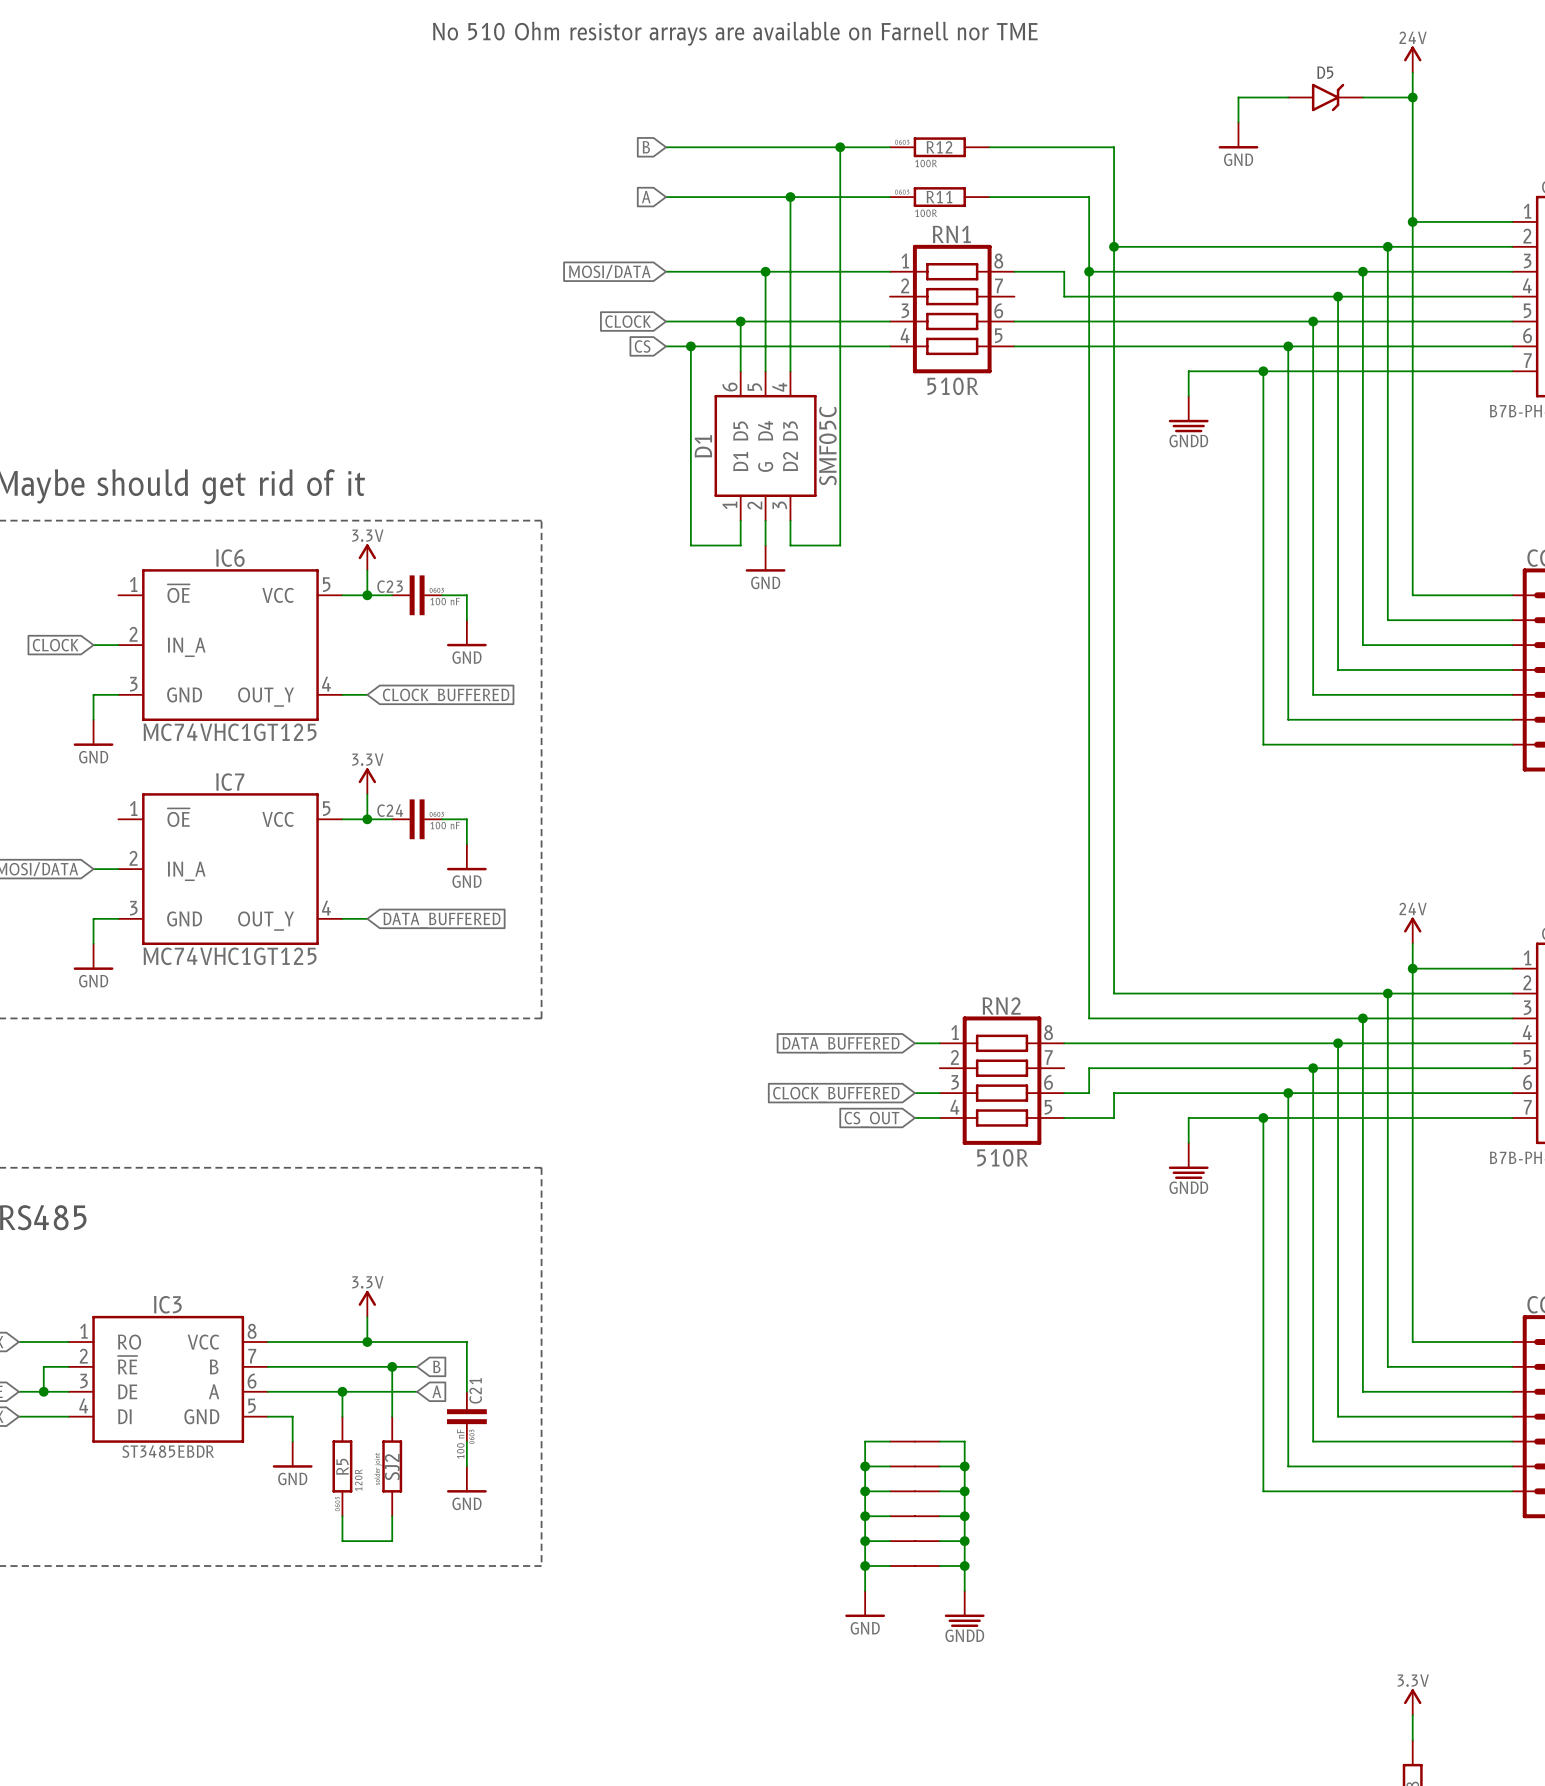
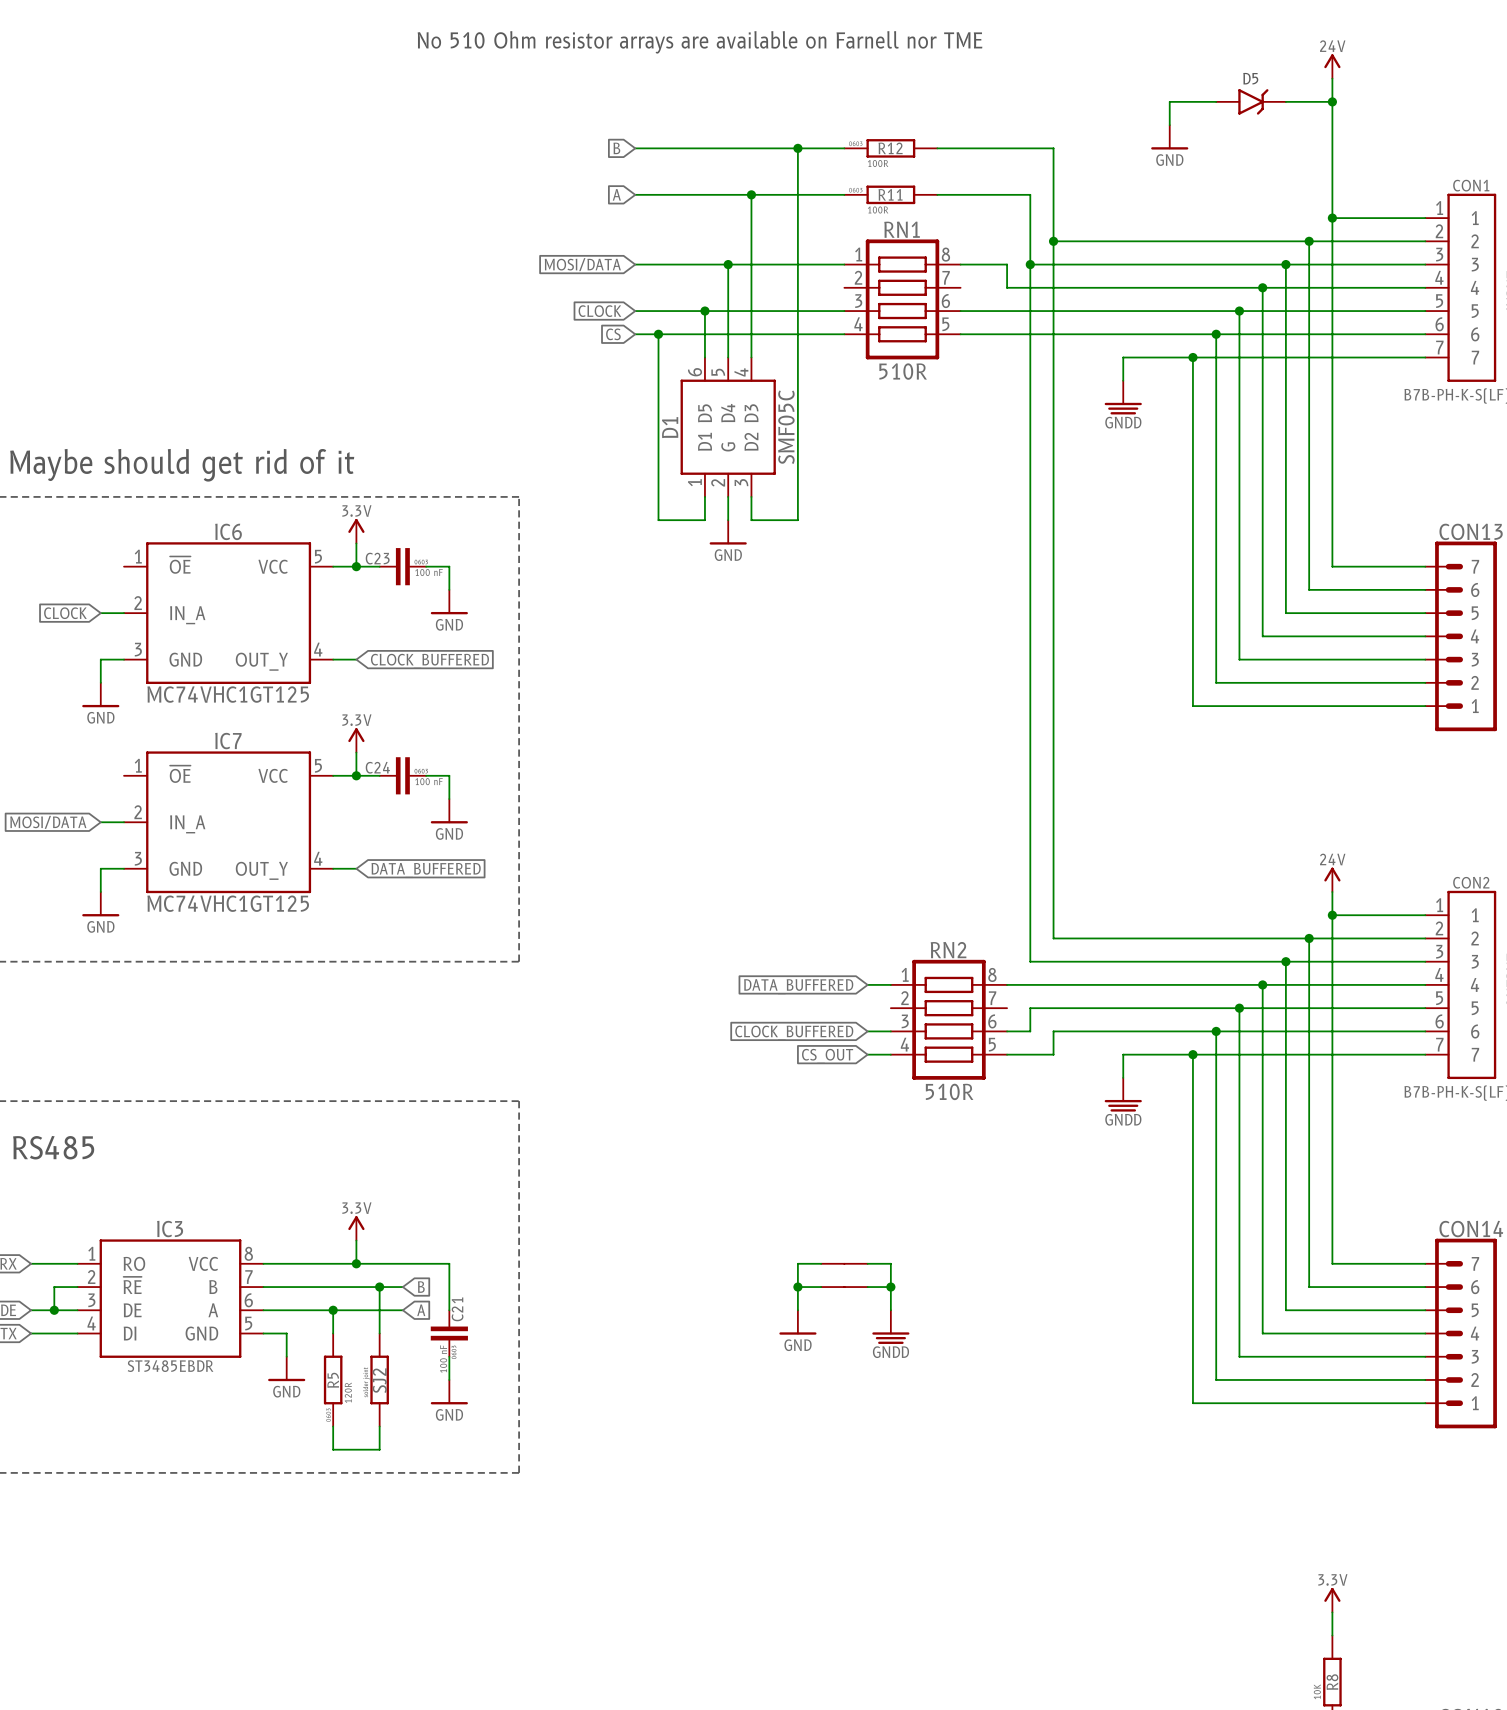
wire: none -> (821, 1263) (797, 1263) (797, 1310)
part: none -> (844, 1263)
wire: none -> (867, 1263) (890, 1263) (890, 1310)
junction: none -> (797, 1287)
part: none -> (844, 1287)
junction: none -> (890, 1287)
wire: (890, 1441) (865, 1441) (865, 1590) -> none
part: (914, 1441) -> none
wire: (939, 1441) (964, 1441) (964, 1590) -> none
wire: (865, 1466) (890, 1466) -> (797, 1287) (821, 1287)
junction: (865, 1466) -> none
part: (914, 1466) -> none
wire: (939, 1466) (964, 1466) -> (867, 1287) (890, 1287)
junction: (964, 1466) -> none
wire: (865, 1491) (890, 1491) -> none
junction: (865, 1491) -> none
part: (914, 1491) -> none
wire: (939, 1491) (964, 1491) -> none
junction: (964, 1491) -> none
wire: (865, 1516) (890, 1516) -> none
junction: (865, 1516) -> none
part: (914, 1516) -> none
wire: (939, 1516) (964, 1516) -> none
junction: (964, 1516) -> none
wire: (865, 1541) (890, 1541) -> none
junction: (865, 1541) -> none
part: (914, 1541) -> none
wire: (939, 1541) (964, 1541) -> none
junction: (964, 1541) -> none
wire: (865, 1566) (890, 1566) -> none
junction: (865, 1566) -> none
part: (914, 1566) -> none
wire: (939, 1566) (964, 1566) -> none
junction: (964, 1566) -> none
power symbol position: GND (865, 1603) -> GND (797, 1322)
power symbol position: GNDD (964, 1608) -> GNDD (890, 1327)

